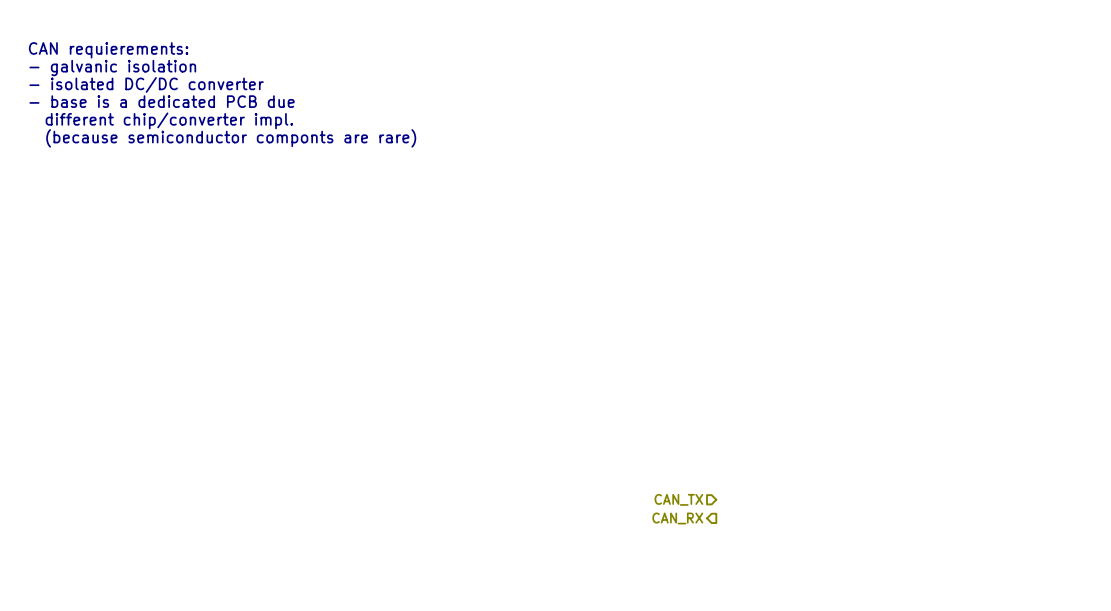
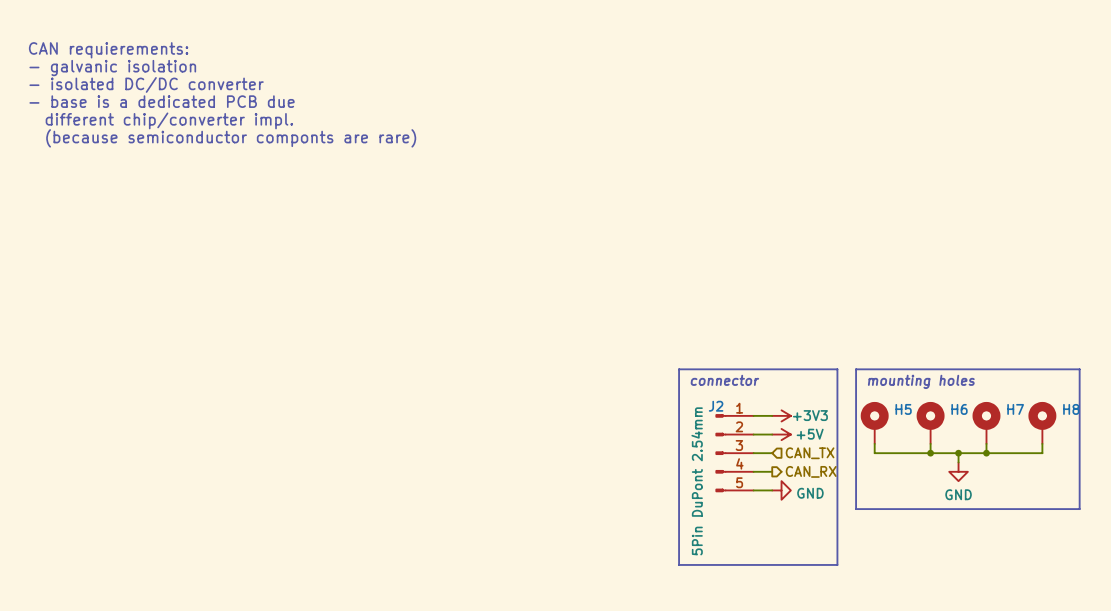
line: none -> (679, 369) (837, 369) (837, 564) (679, 564) (679, 369)
line: none -> (856, 369) (1079, 369) (1079, 509) (856, 509) (856, 369)
text: none -> connector (724, 380)
text: none -> mounting holes (921, 381)
wire: none -> (753, 415) (772, 415)
power symbol: none -> +3V3 (781, 415)
H5: none -> (874, 422)
H6: none -> (930, 422)
H7: none -> (986, 422)
H8: none -> (1042, 422)
wire: none -> (753, 434) (772, 434)
power symbol: none -> +5V (781, 434)
wire: none -> (874, 443) (874, 453) (1042, 453) (1042, 443)
wire: none -> (930, 443) (930, 453)
wire: none -> (986, 443) (986, 453)
J2: none -> 5Pin DuPont 2.54mm (734, 453)
wire: none -> (753, 453) (772, 453)
junction: none -> (930, 453)
wire: none -> (958, 453) (958, 462)
junction: none -> (958, 453)
junction: none -> (986, 453)
wire: none -> (753, 471) (772, 471)
power symbol: none -> GND (958, 471)
wire: none -> (753, 490) (772, 490)
power symbol: none -> GND (781, 490)
hierarchical label rotation: 0° (678, 499) -> 180° (810, 453)
hierarchical label position: CAN_TX (678, 499) -> CAN_TX (810, 453)
hierarchical label rotation: 0° (677, 518) -> 180° (811, 471)
hierarchical label position: CAN_RX (677, 518) -> CAN_RX (811, 471)

